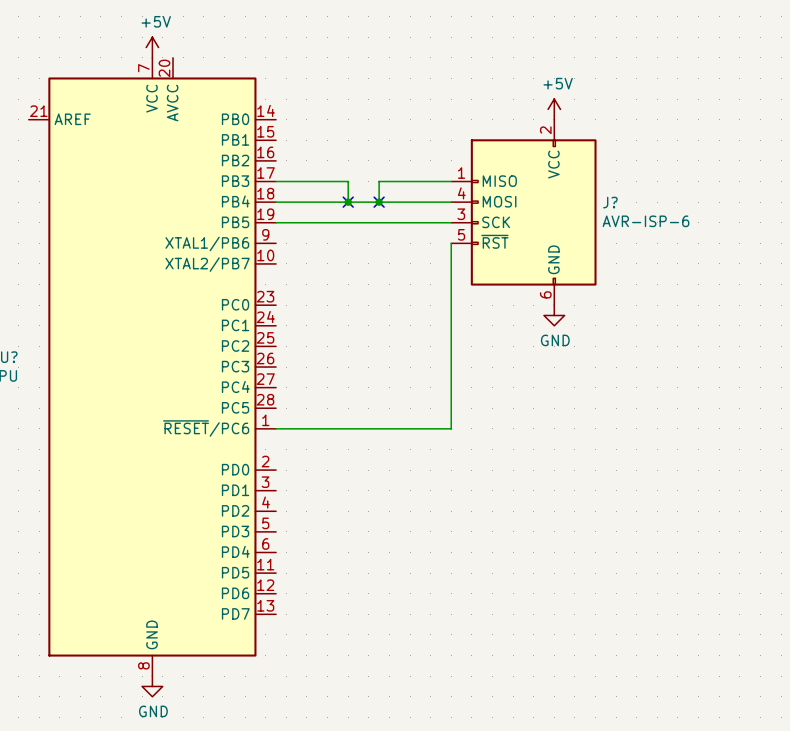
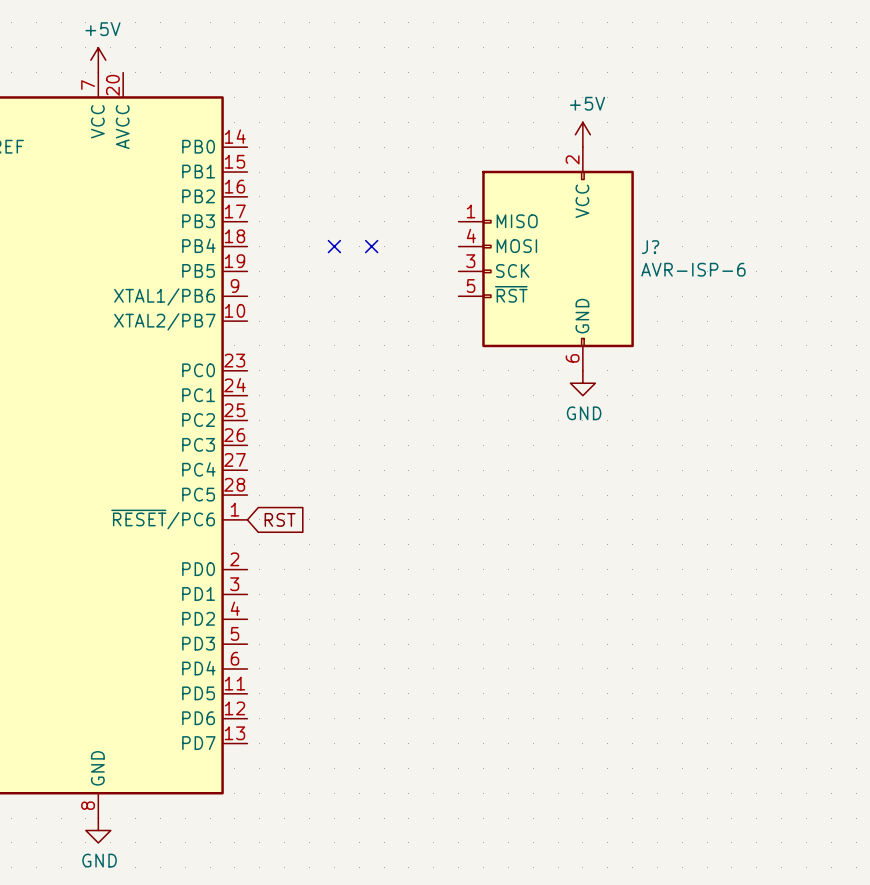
wire: (276, 181) (348, 181) (348, 202) -> none
wire: (451, 181) (379, 181) (379, 202) -> none
wire: (276, 202) (451, 202) -> none
junction: (348, 202) -> none
junction: (379, 202) -> none
wire: (276, 222) (451, 222) -> none
wire: (451, 243) (451, 428) (276, 428) -> none
global label: none -> RST (280, 519)

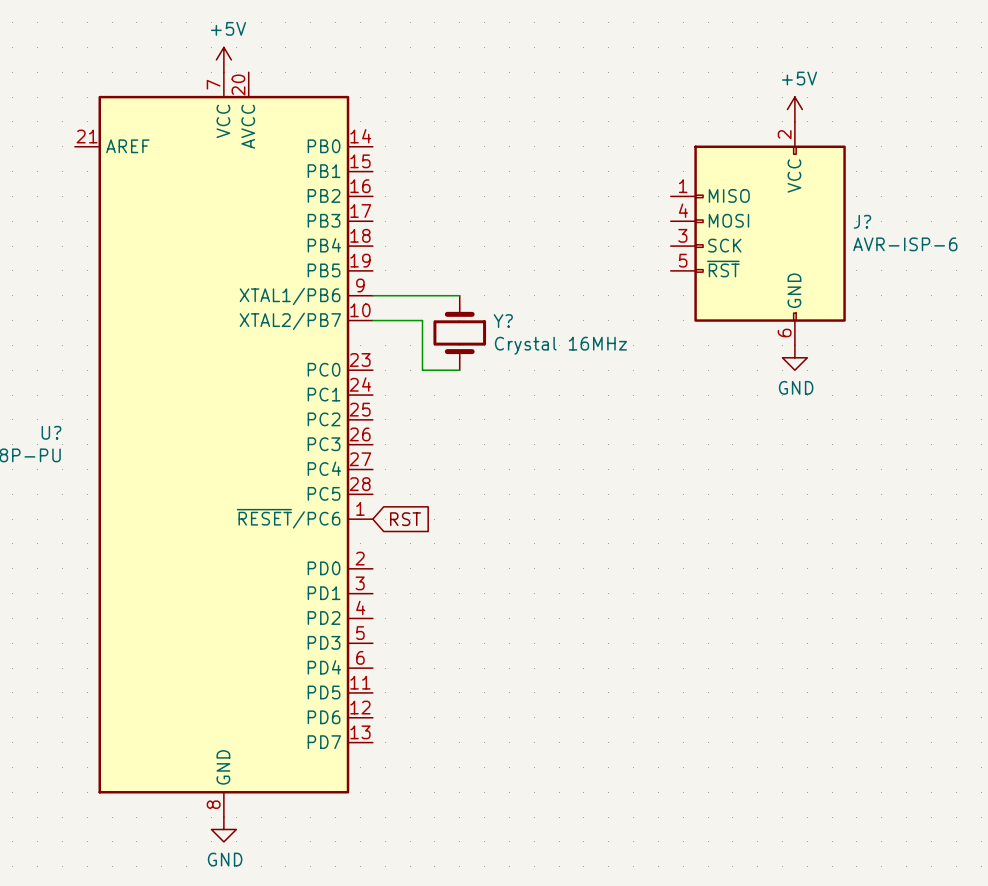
power symbol position: +5V (582, 134) -> +5V (794, 109)
no-connect mark: (334, 246) -> none
no-connect mark: (371, 246) -> none
J? position: (546, 258) -> (758, 233)
wire: none -> (372, 295) (459, 295)
wire: none -> (372, 320) (422, 320) (422, 370) (459, 370)
Y?: none -> Crystal 16MHz (459, 332)
power symbol position: GND (582, 383) -> GND (794, 357)

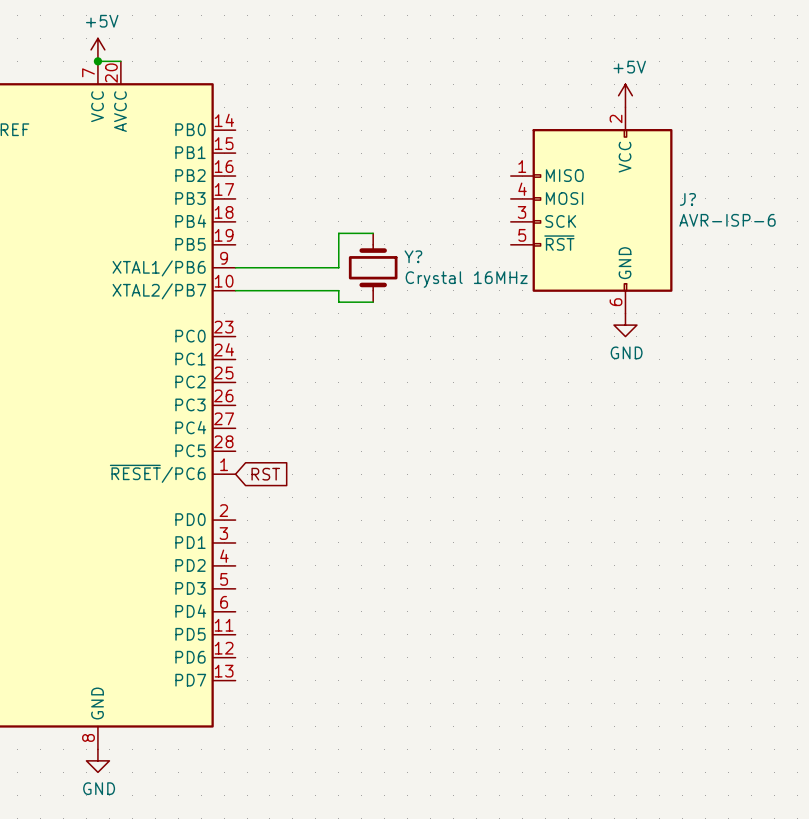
wire: none -> (97, 61) (120, 61)
junction: none -> (97, 61)
wire: none -> (373, 233) (338, 233) (338, 267) (315, 267)
wire: (422, 320) (422, 370) (459, 370) -> (281, 290) (338, 290) (338, 302) (373, 302)
Y? position: (459, 332) -> (373, 267)

